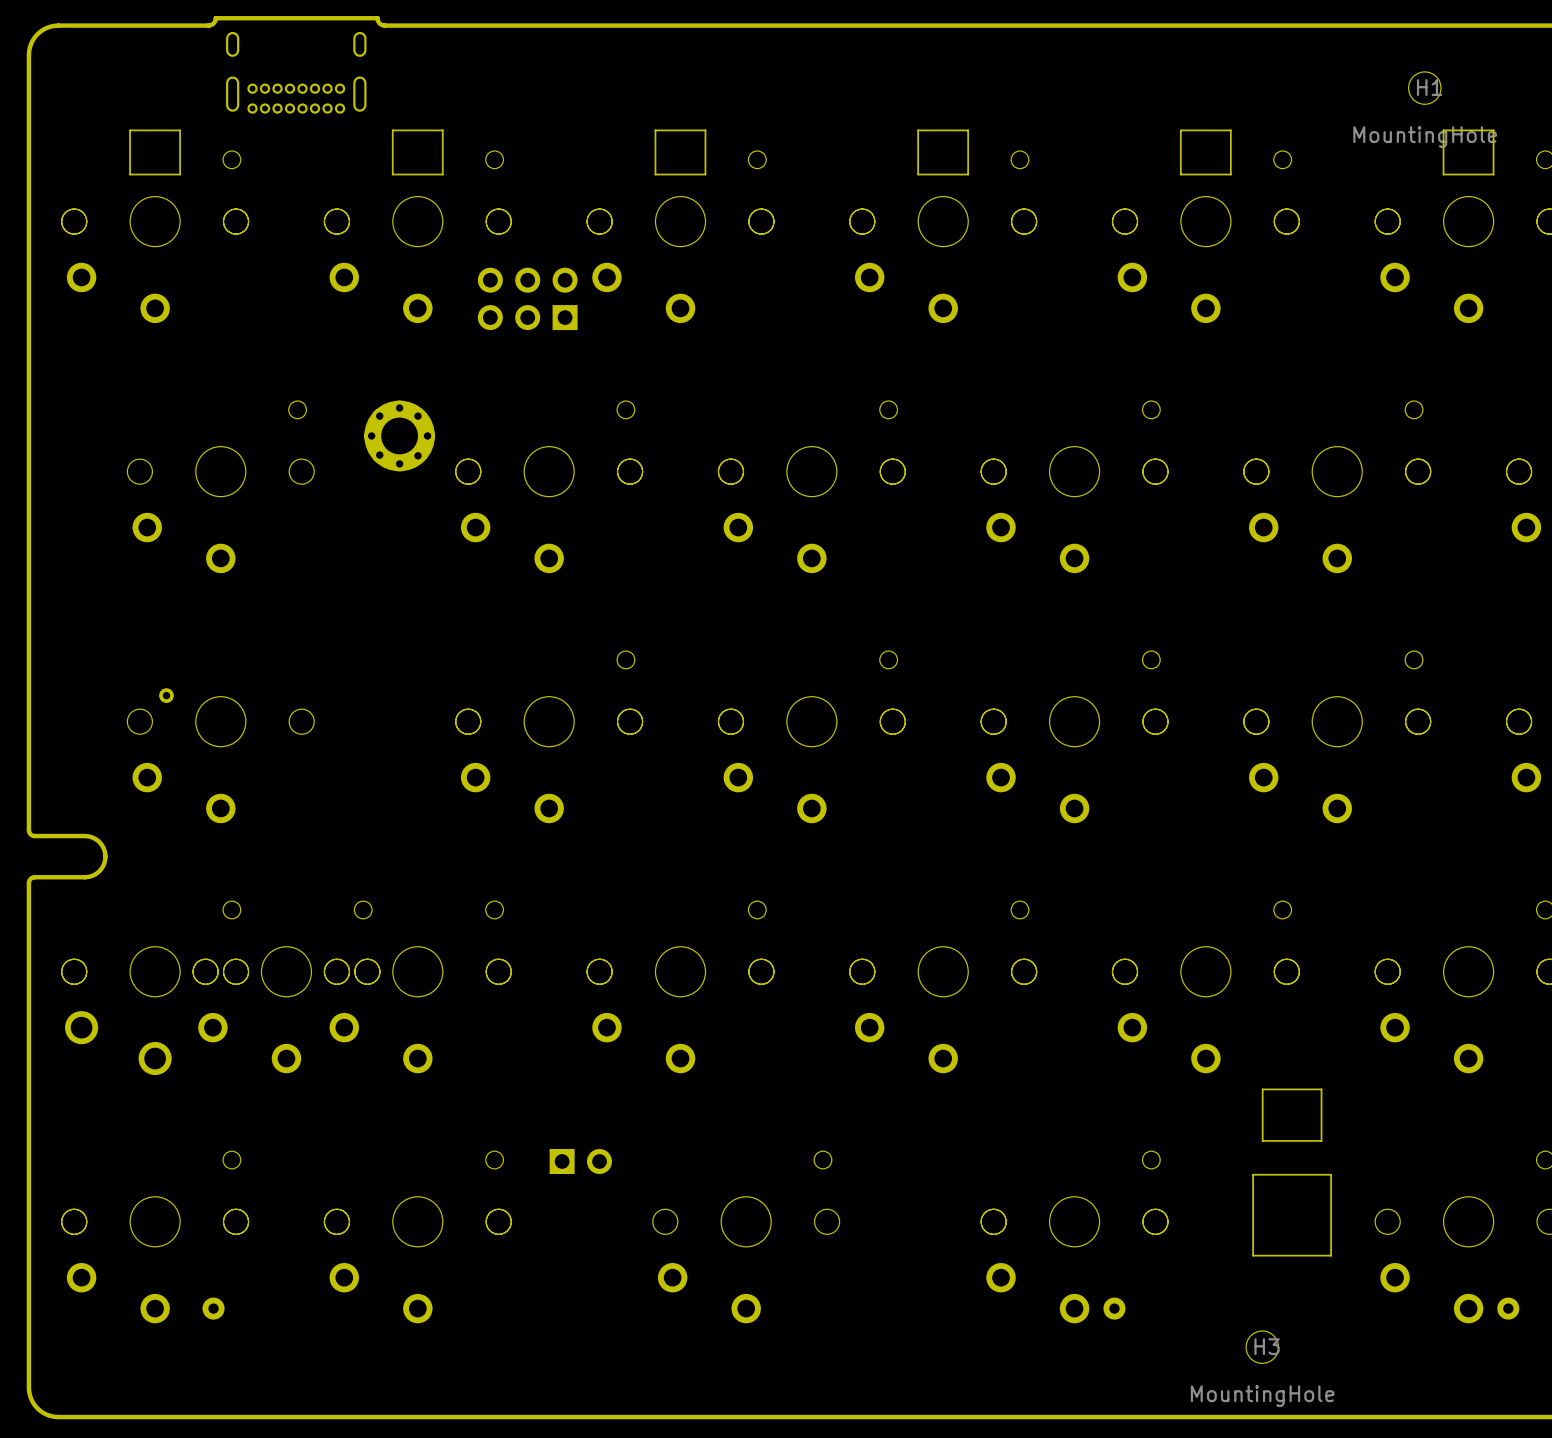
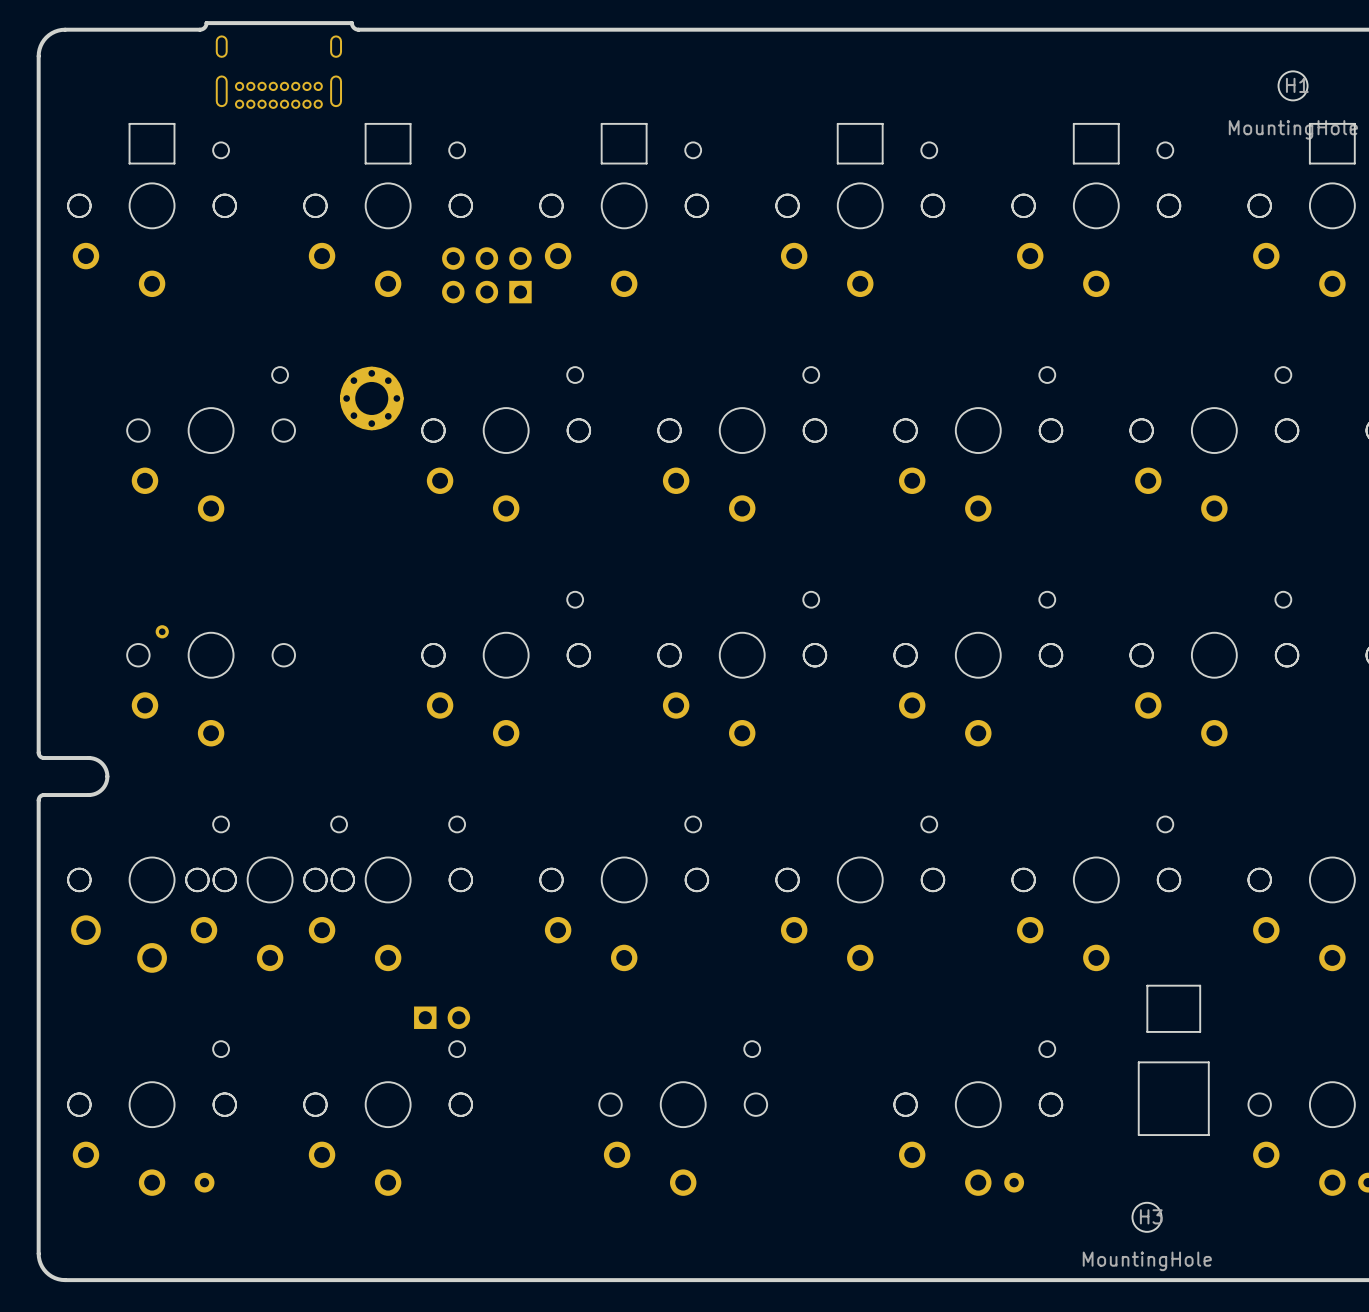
part position: (580, 1161) -> (442, 1017)

